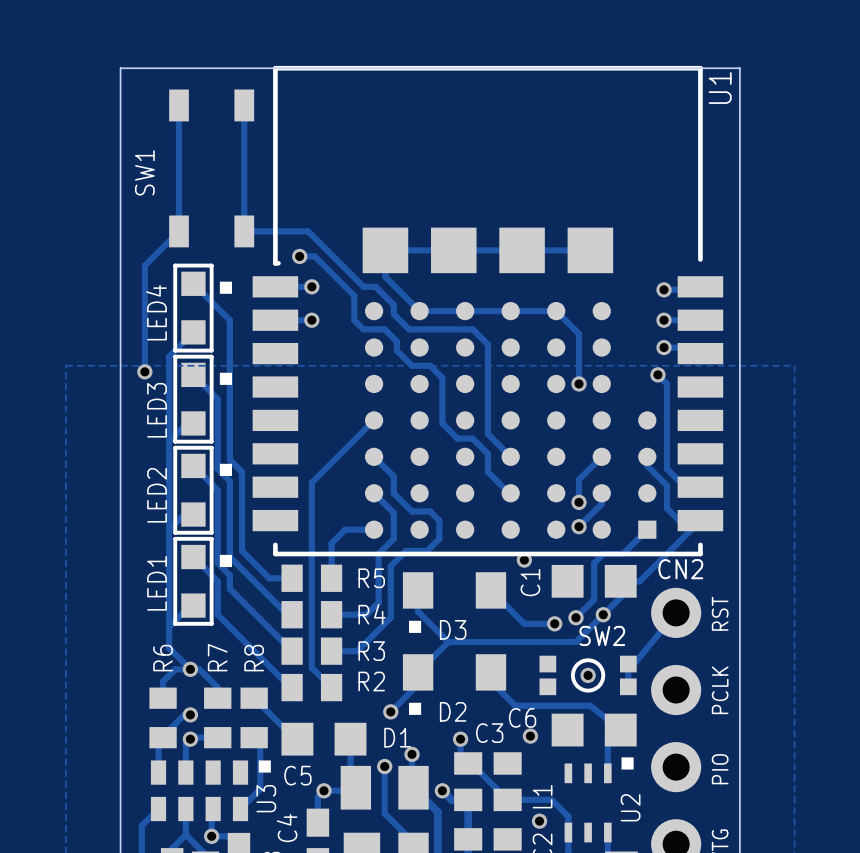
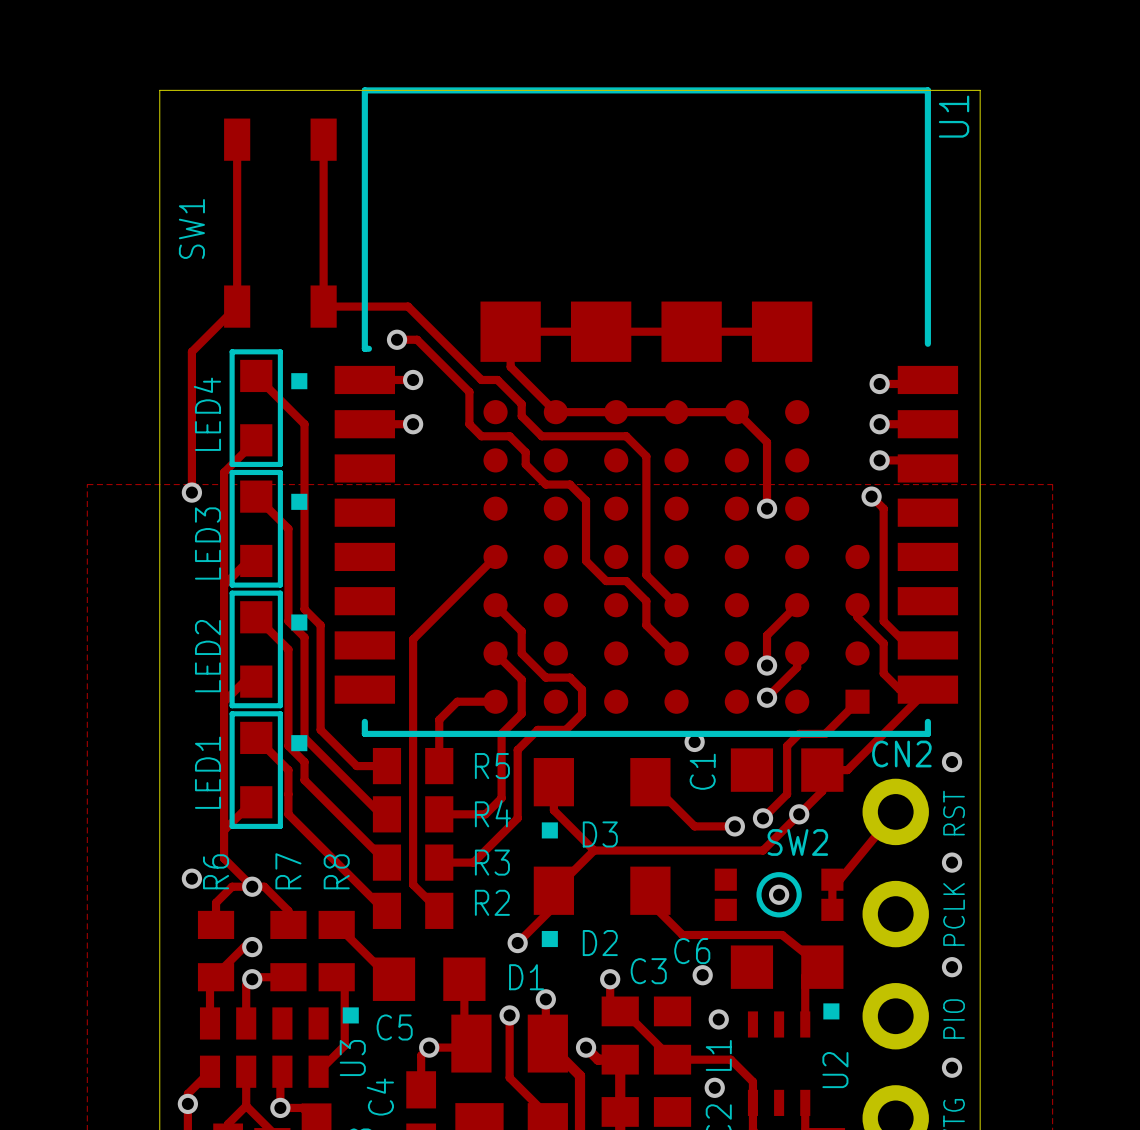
via: none -> (952, 762)
via: none -> (952, 862)
via: none -> (191, 878)
via: none -> (952, 967)
via: none -> (718, 1019)
via: none -> (952, 1067)
via: none -> (187, 1103)

